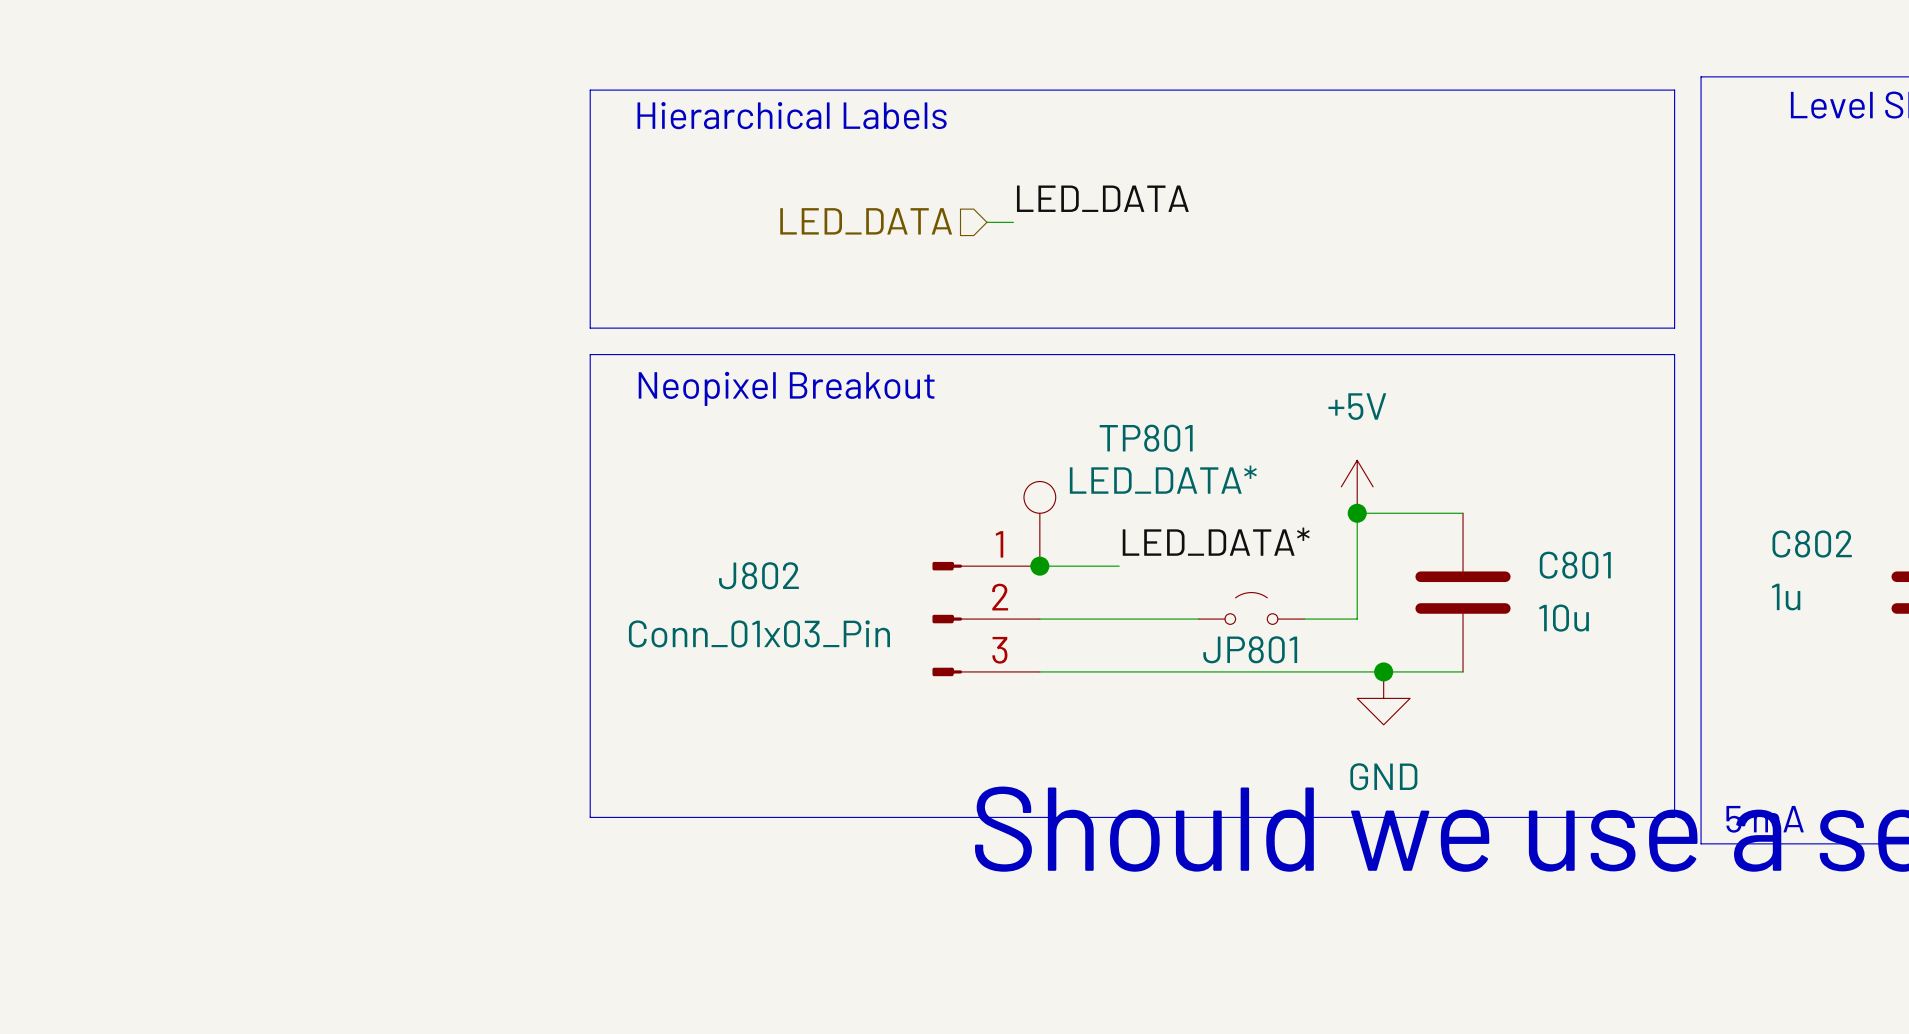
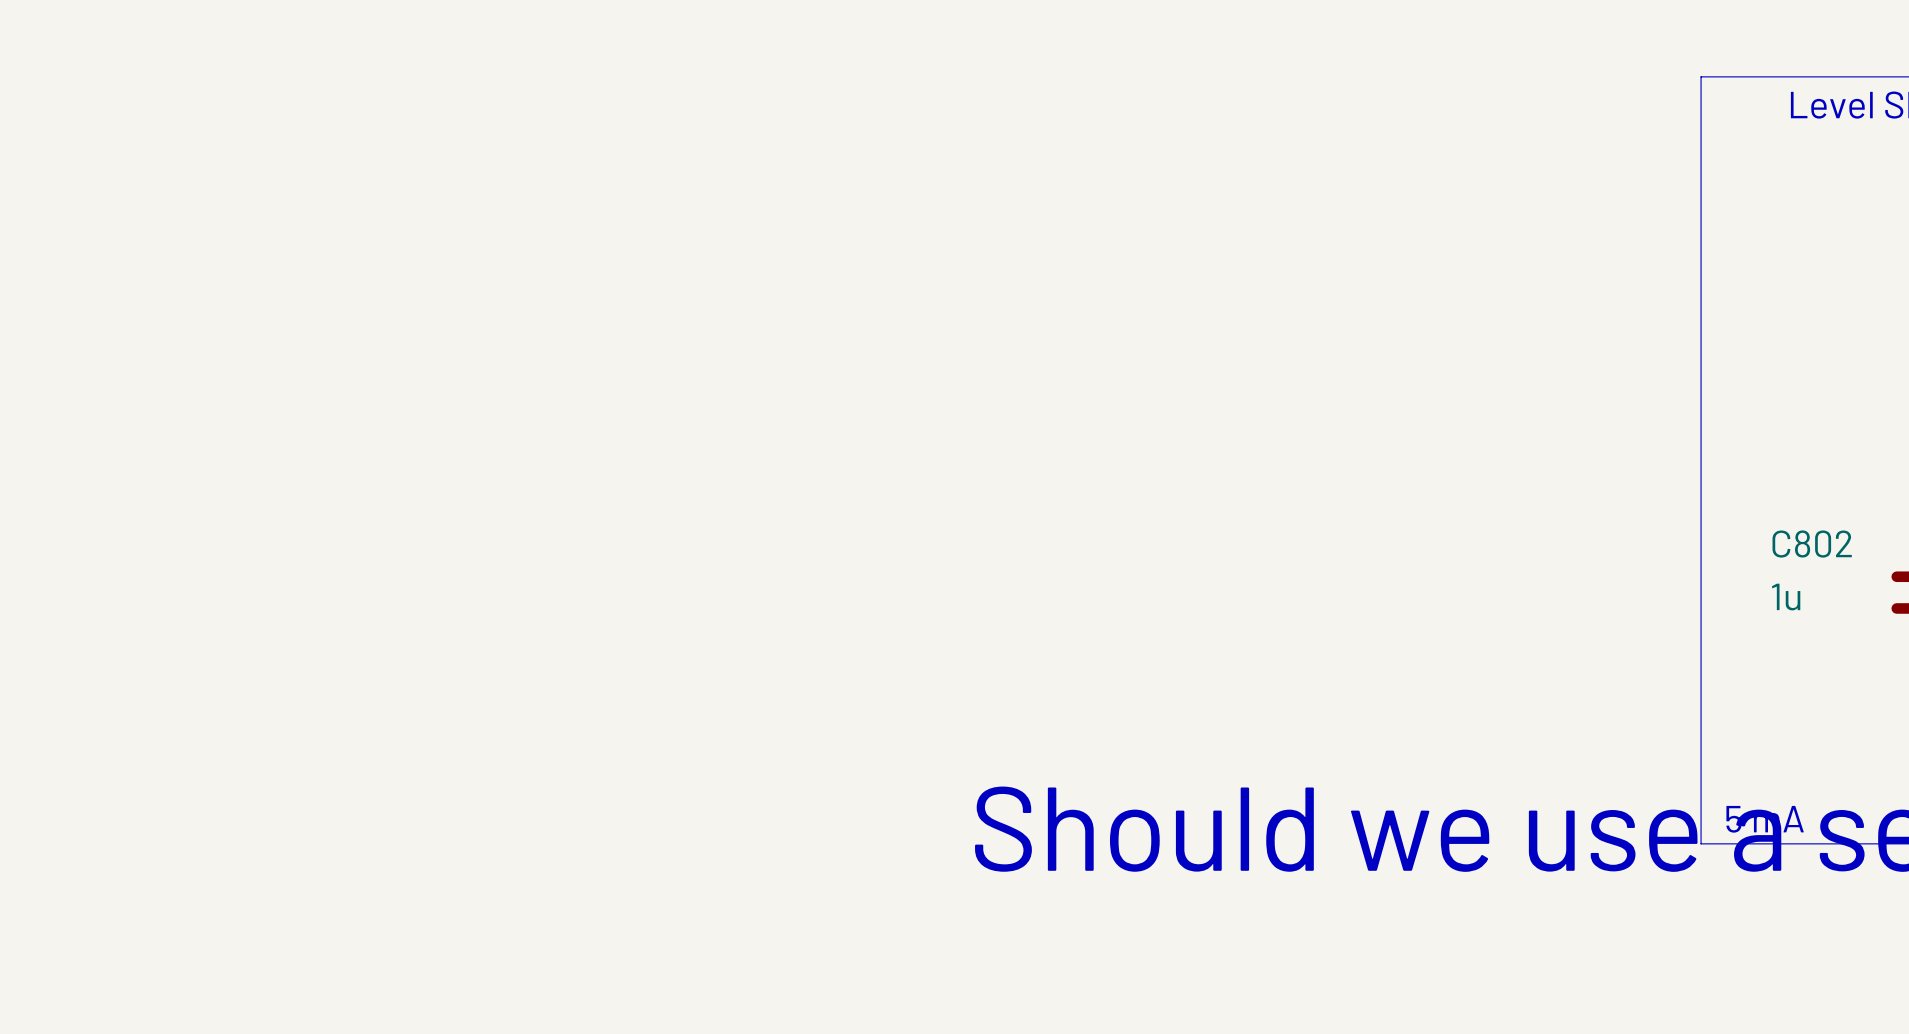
line: (590, 90) (1674, 90) (1674, 328) (590, 328) (590, 90) -> none
text: Hierarchical Labels (792, 115) -> none
label: LED_DATA (1102, 198) -> none
hierarchical label: LED_DATA (866, 221) -> none
wire: (986, 222) (1013, 222) -> none
line: (590, 354) (590, 817) (1674, 817) (1674, 354) (590, 354) -> none
text: Neopixel Breakout (786, 388) -> none
power symbol: +5V (1357, 486) -> none
junction: (1357, 513) -> none
wire: (1463, 513) (1357, 513) (1357, 619) (1304, 619) -> none
TP801: LED_DATA* (1039, 523) -> none
label: LED_DATA* (1216, 541) -> none
wire: (1039, 566) (1119, 566) -> none
junction: (1039, 566) -> none
C801: 10u (1463, 592) -> none
JP801: (1251, 608) -> none
J802: Conn_01x03_Pin (986, 619) -> none
wire: (1039, 619) (1198, 619) -> none
wire: (1039, 671) (1463, 671) -> none
junction: (1383, 671) -> none
power symbol: GND (1383, 698) -> none

